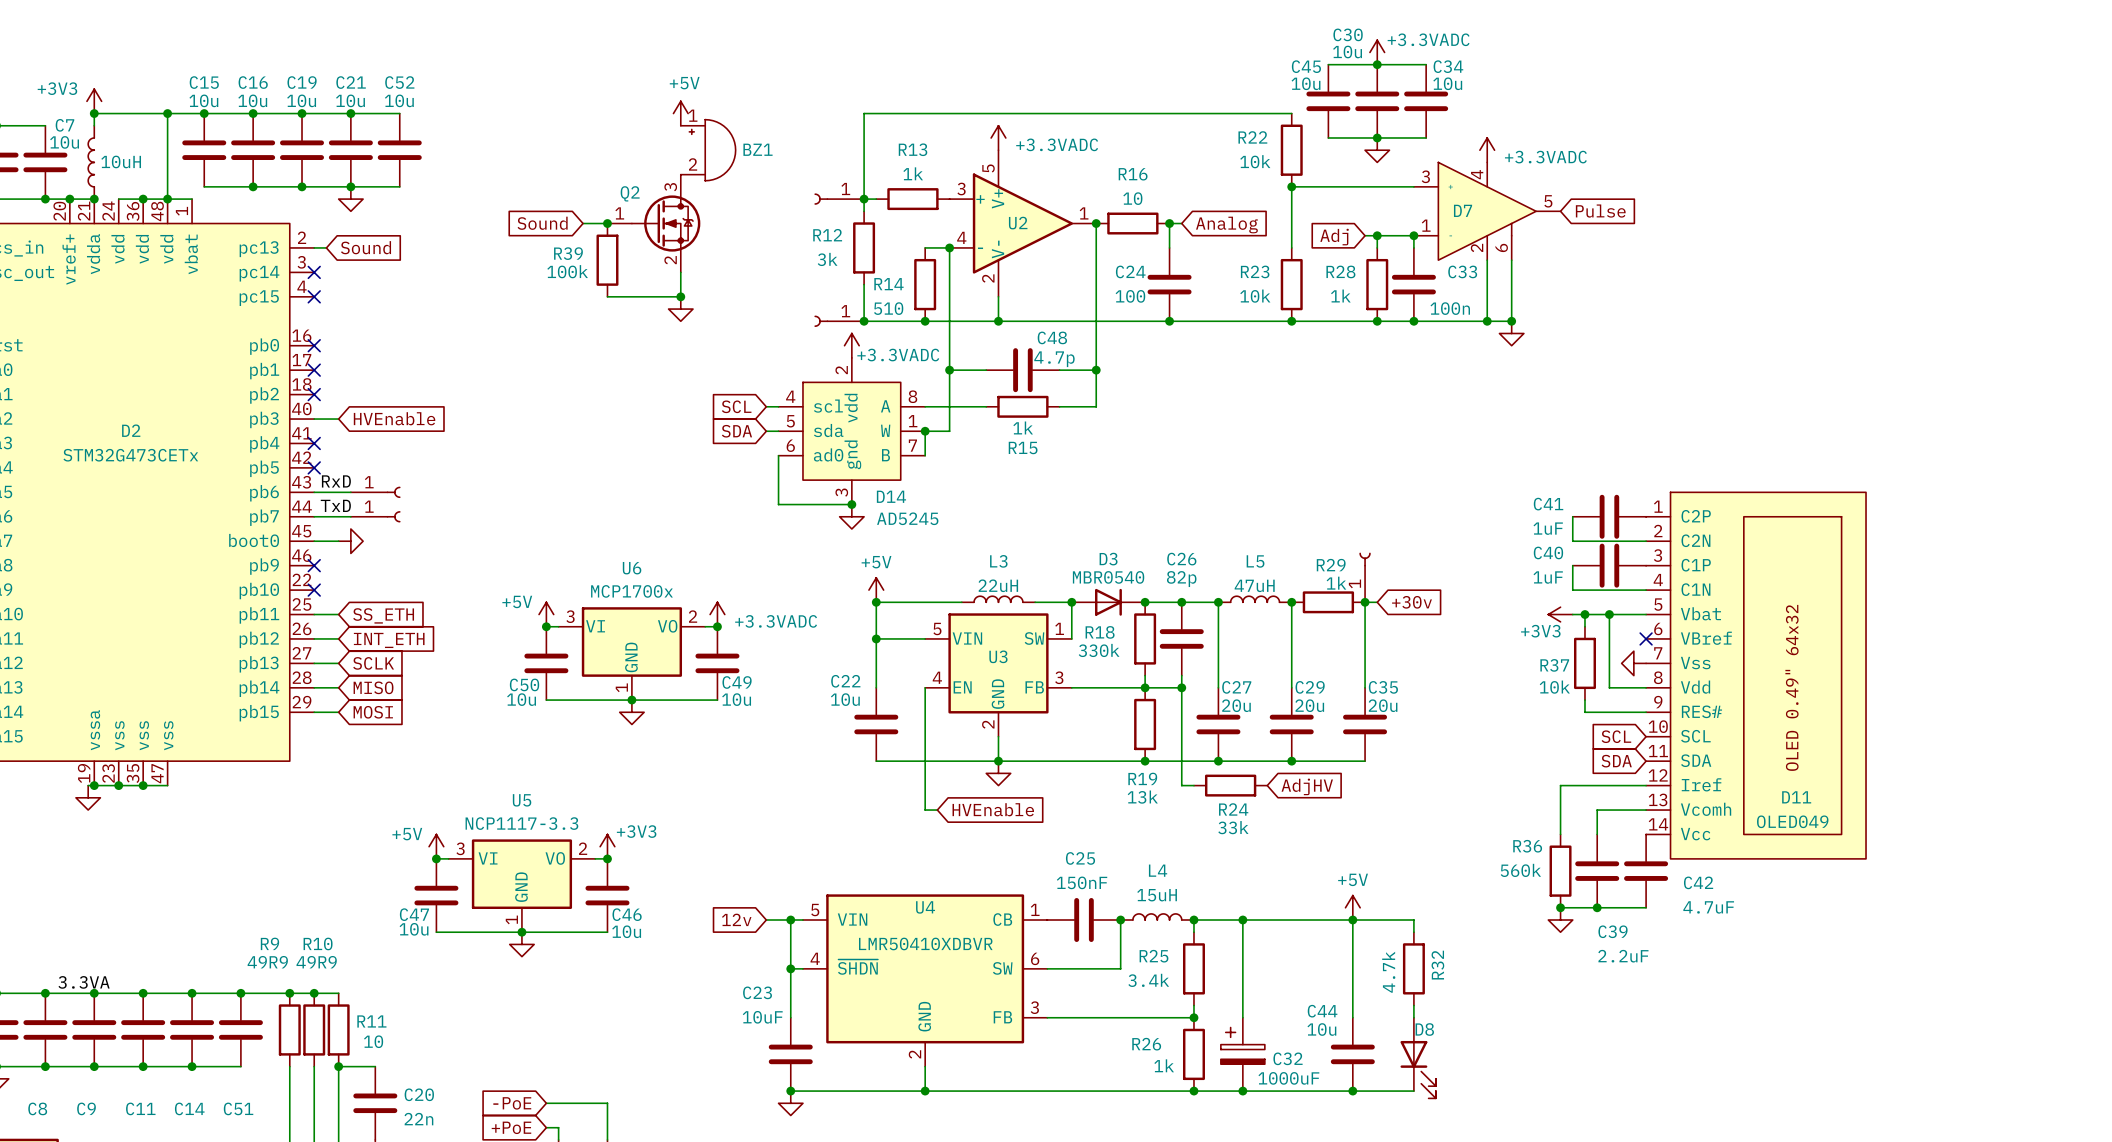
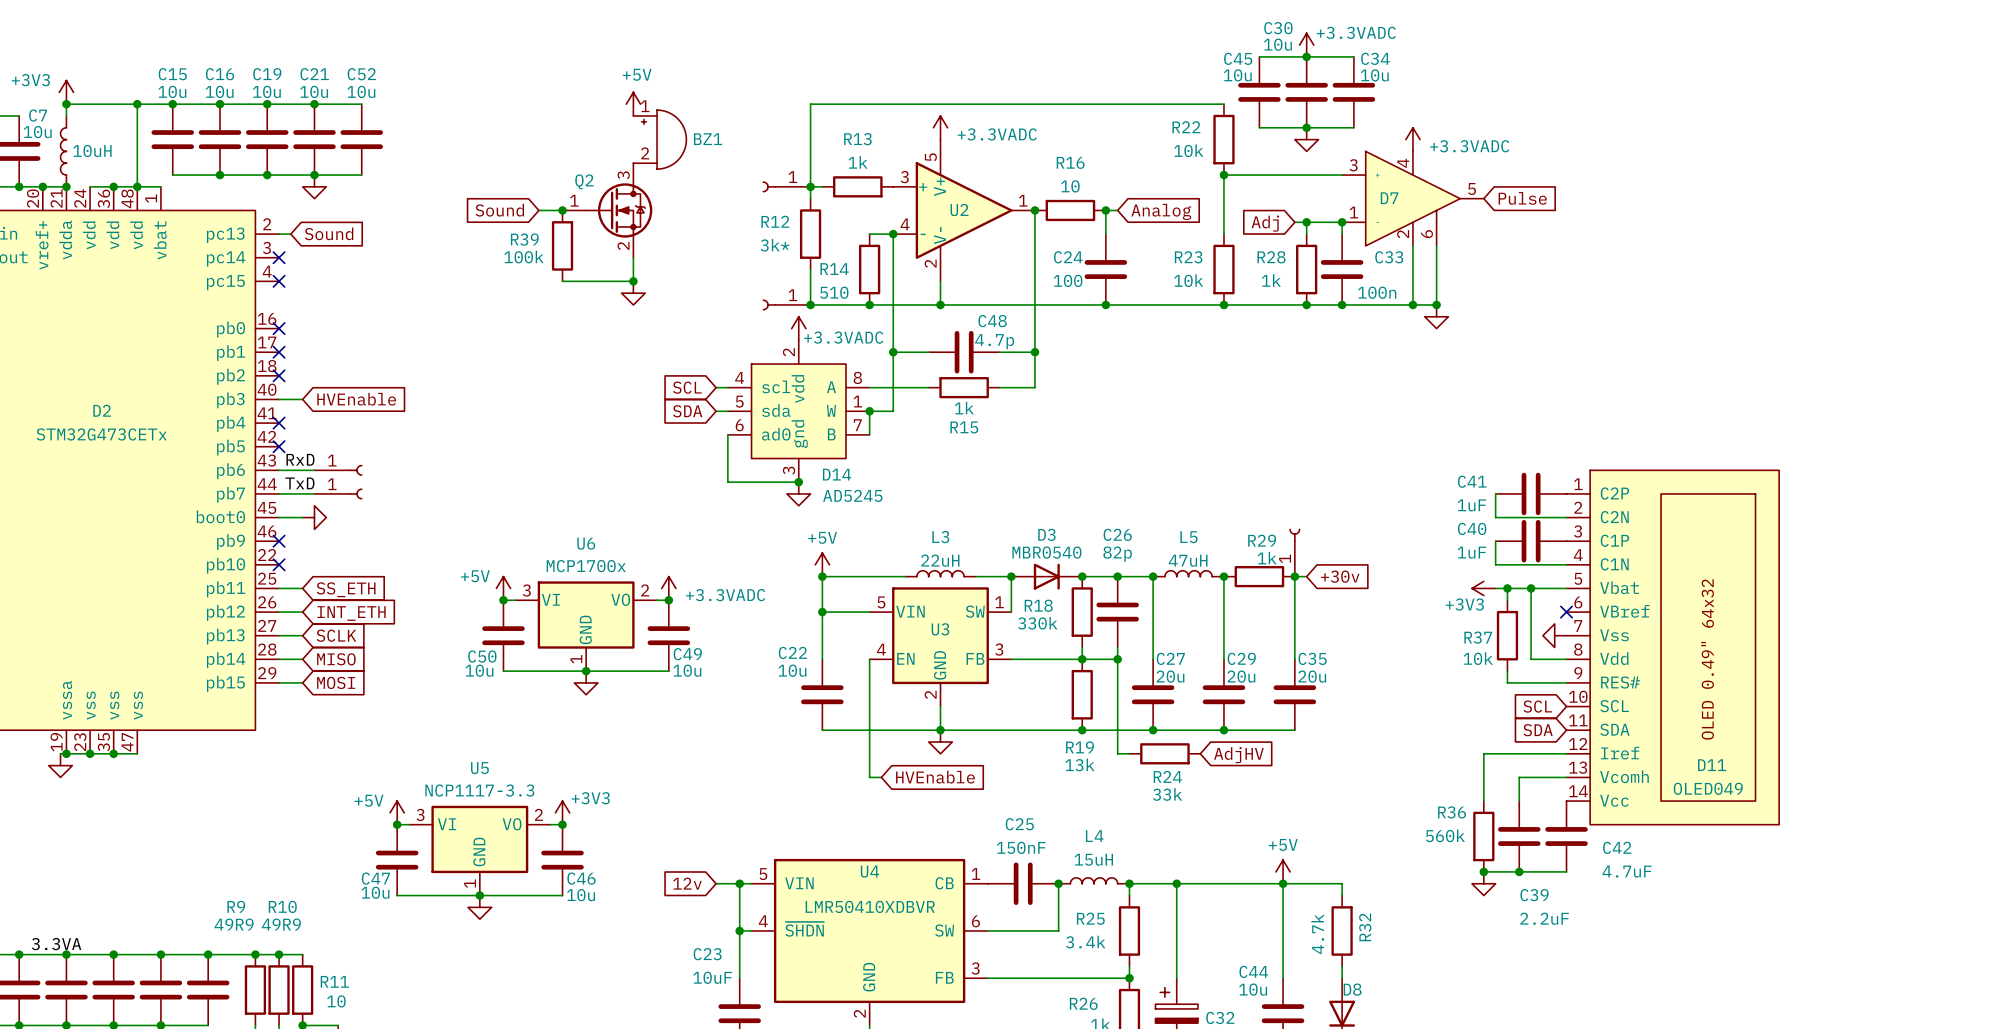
R12 value: 3k (827, 259) -> 3k* (775, 245)

